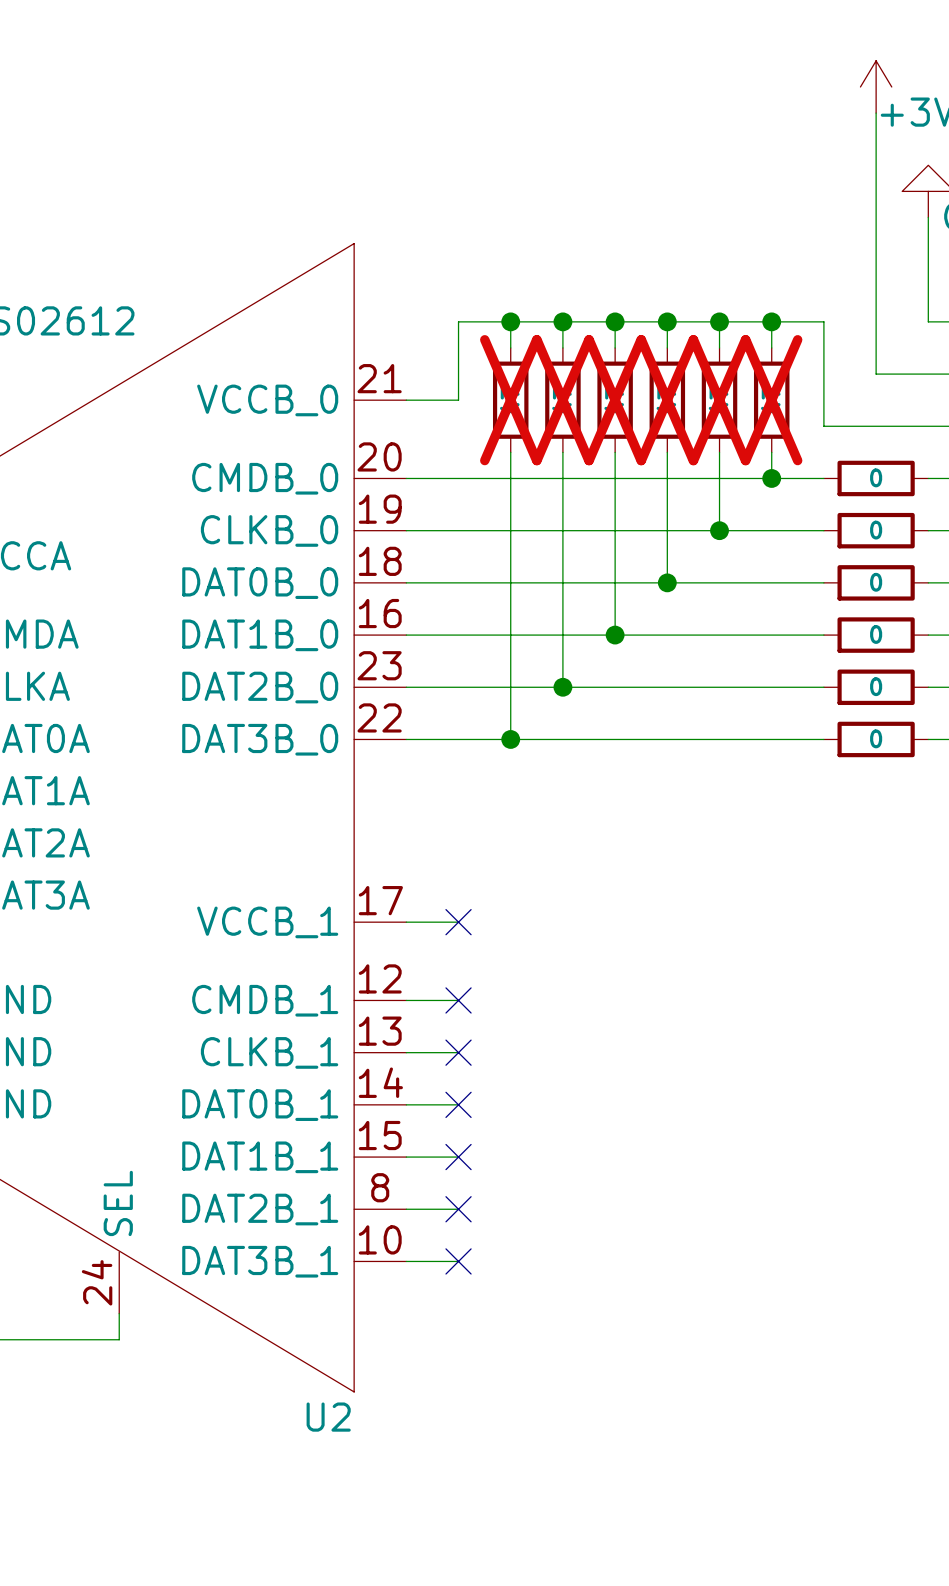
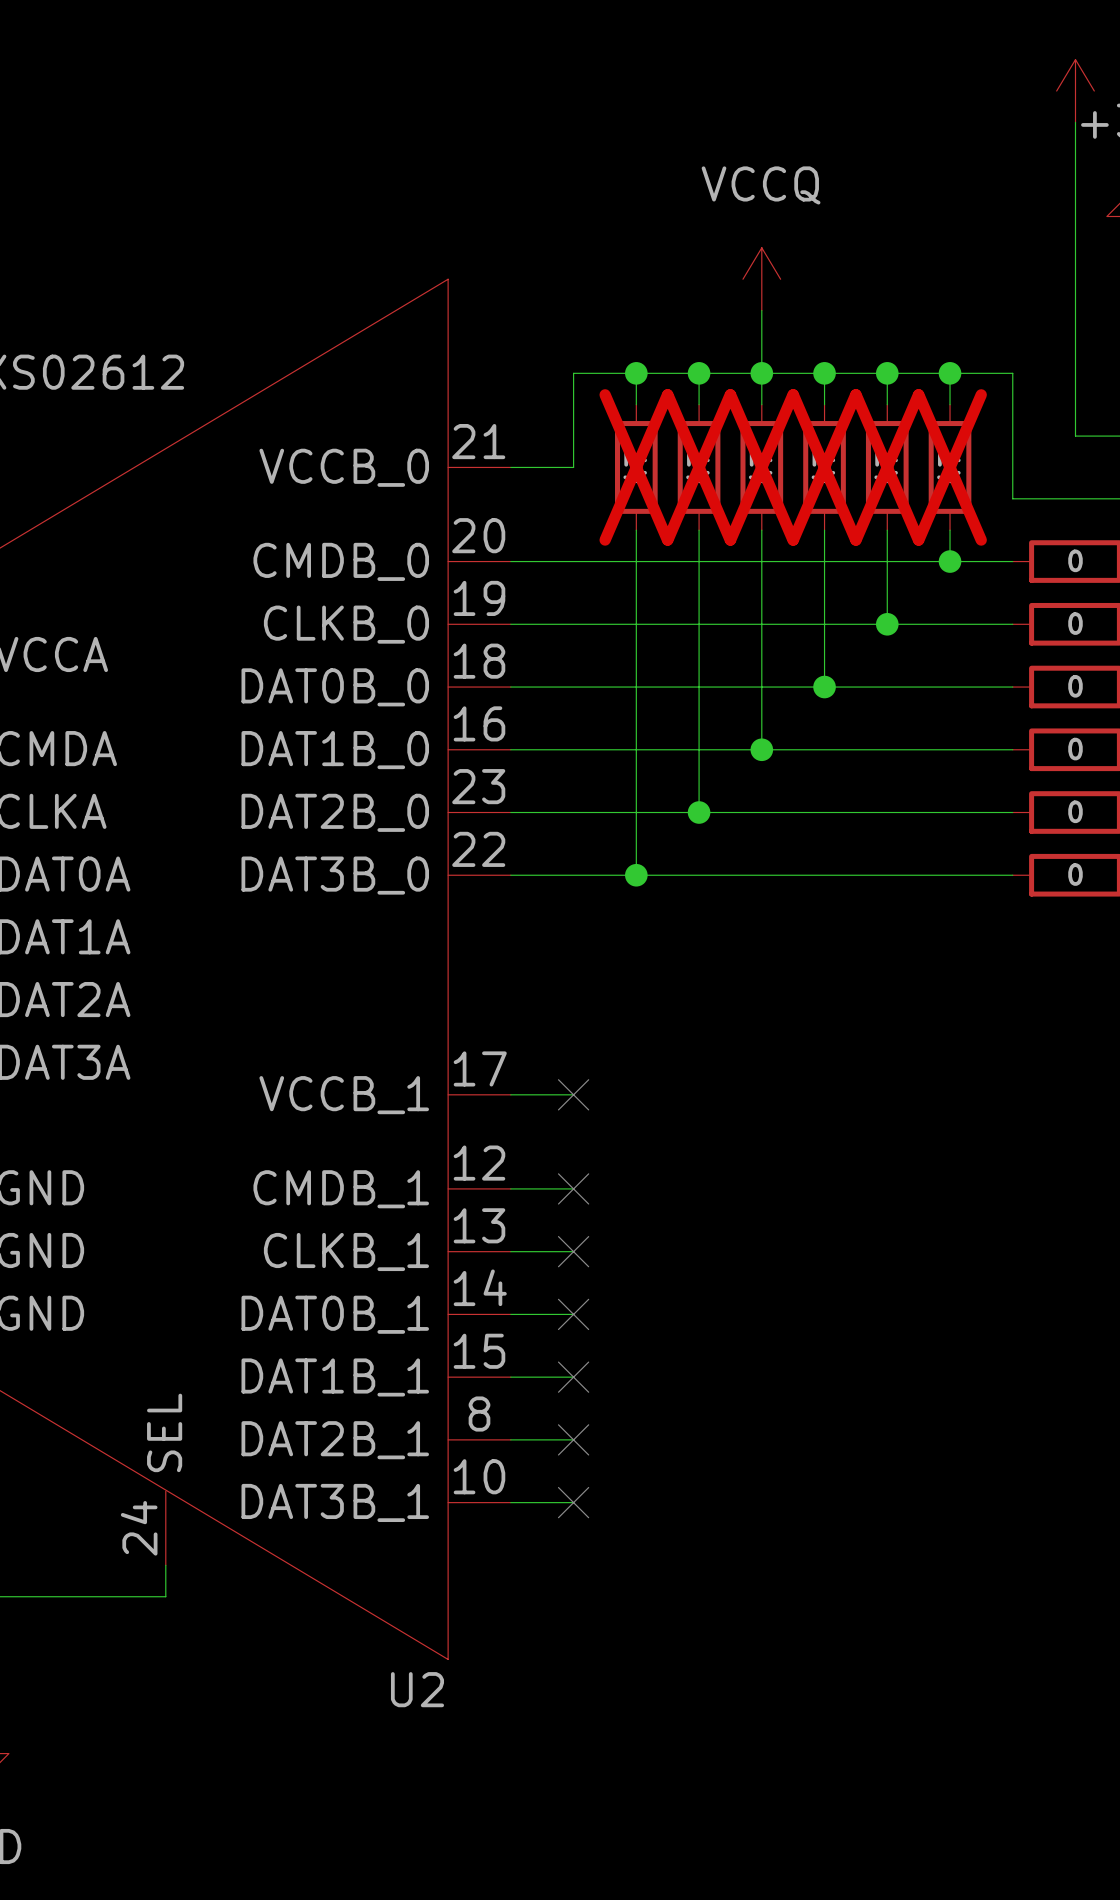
power symbol: none -> VCCQ (761, 279)
wire: none -> (761, 310) (761, 373)

